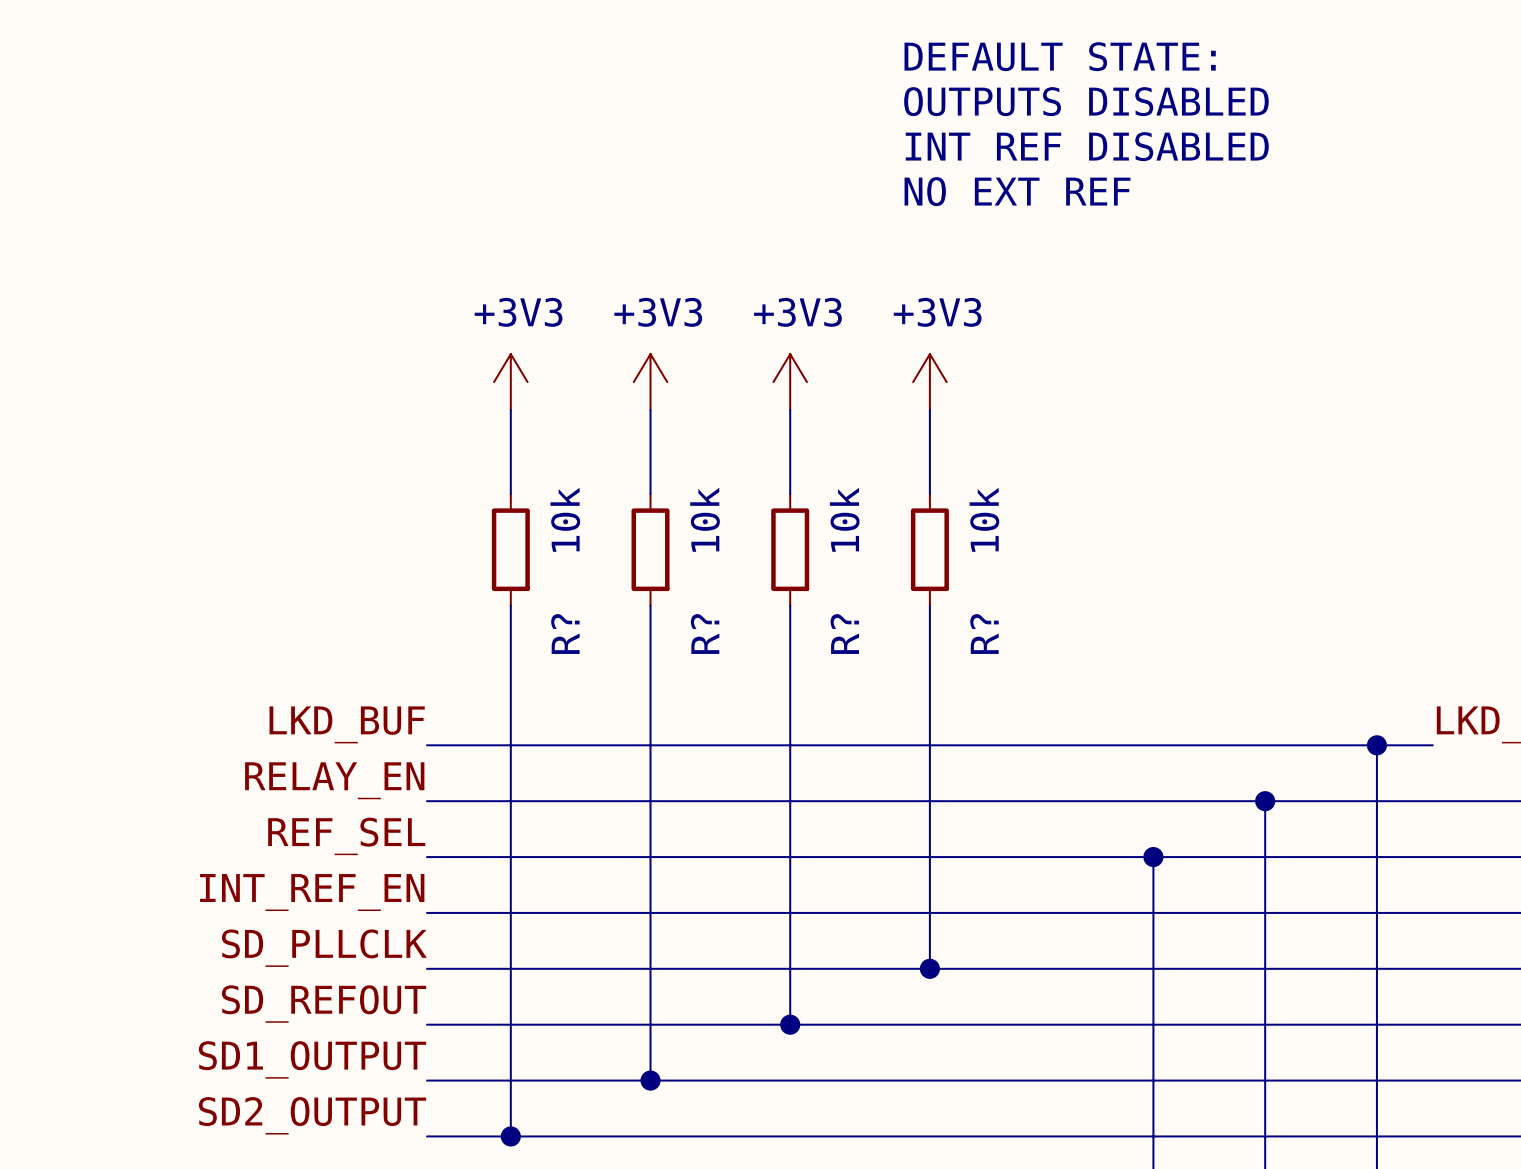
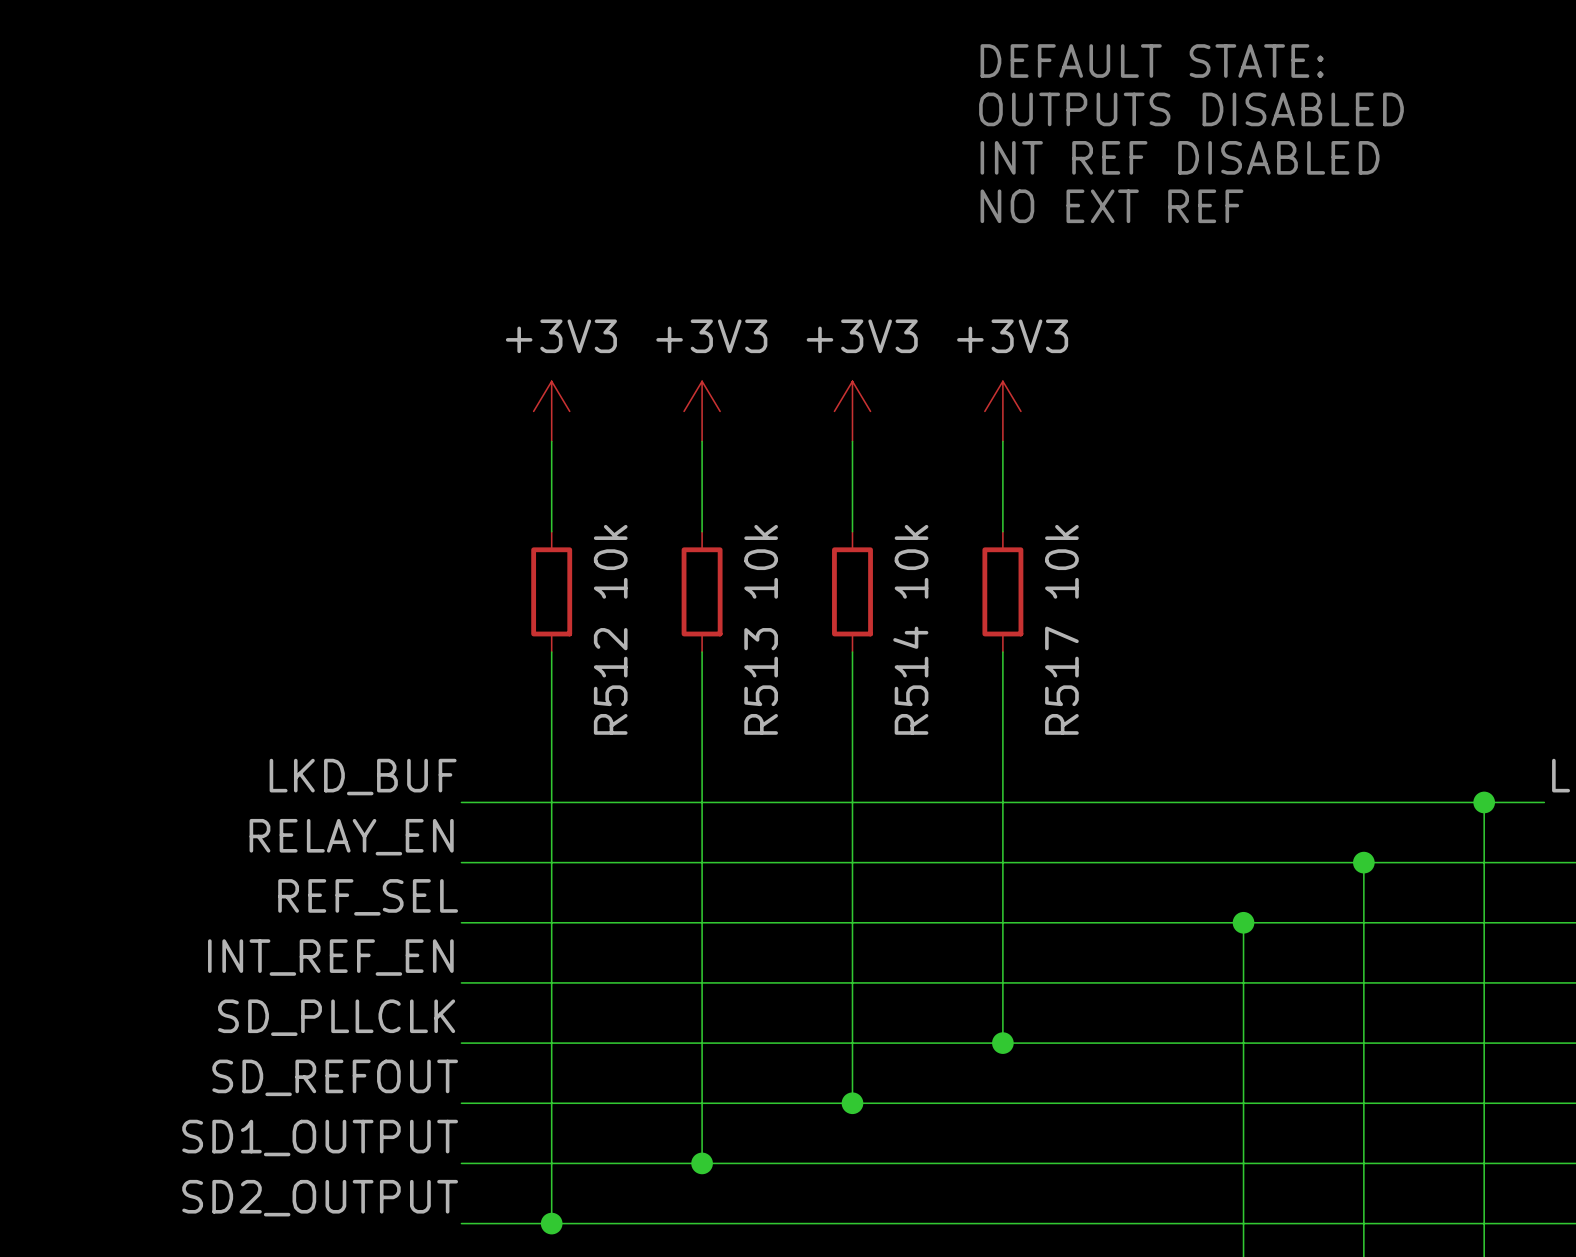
R? name: R? (565, 634) -> R512 (610, 681)
R? name: R? (705, 634) -> R513 (761, 681)
R? name: R? (844, 634) -> R514 (910, 680)
R? name: R? (984, 634) -> R517 (1061, 680)

